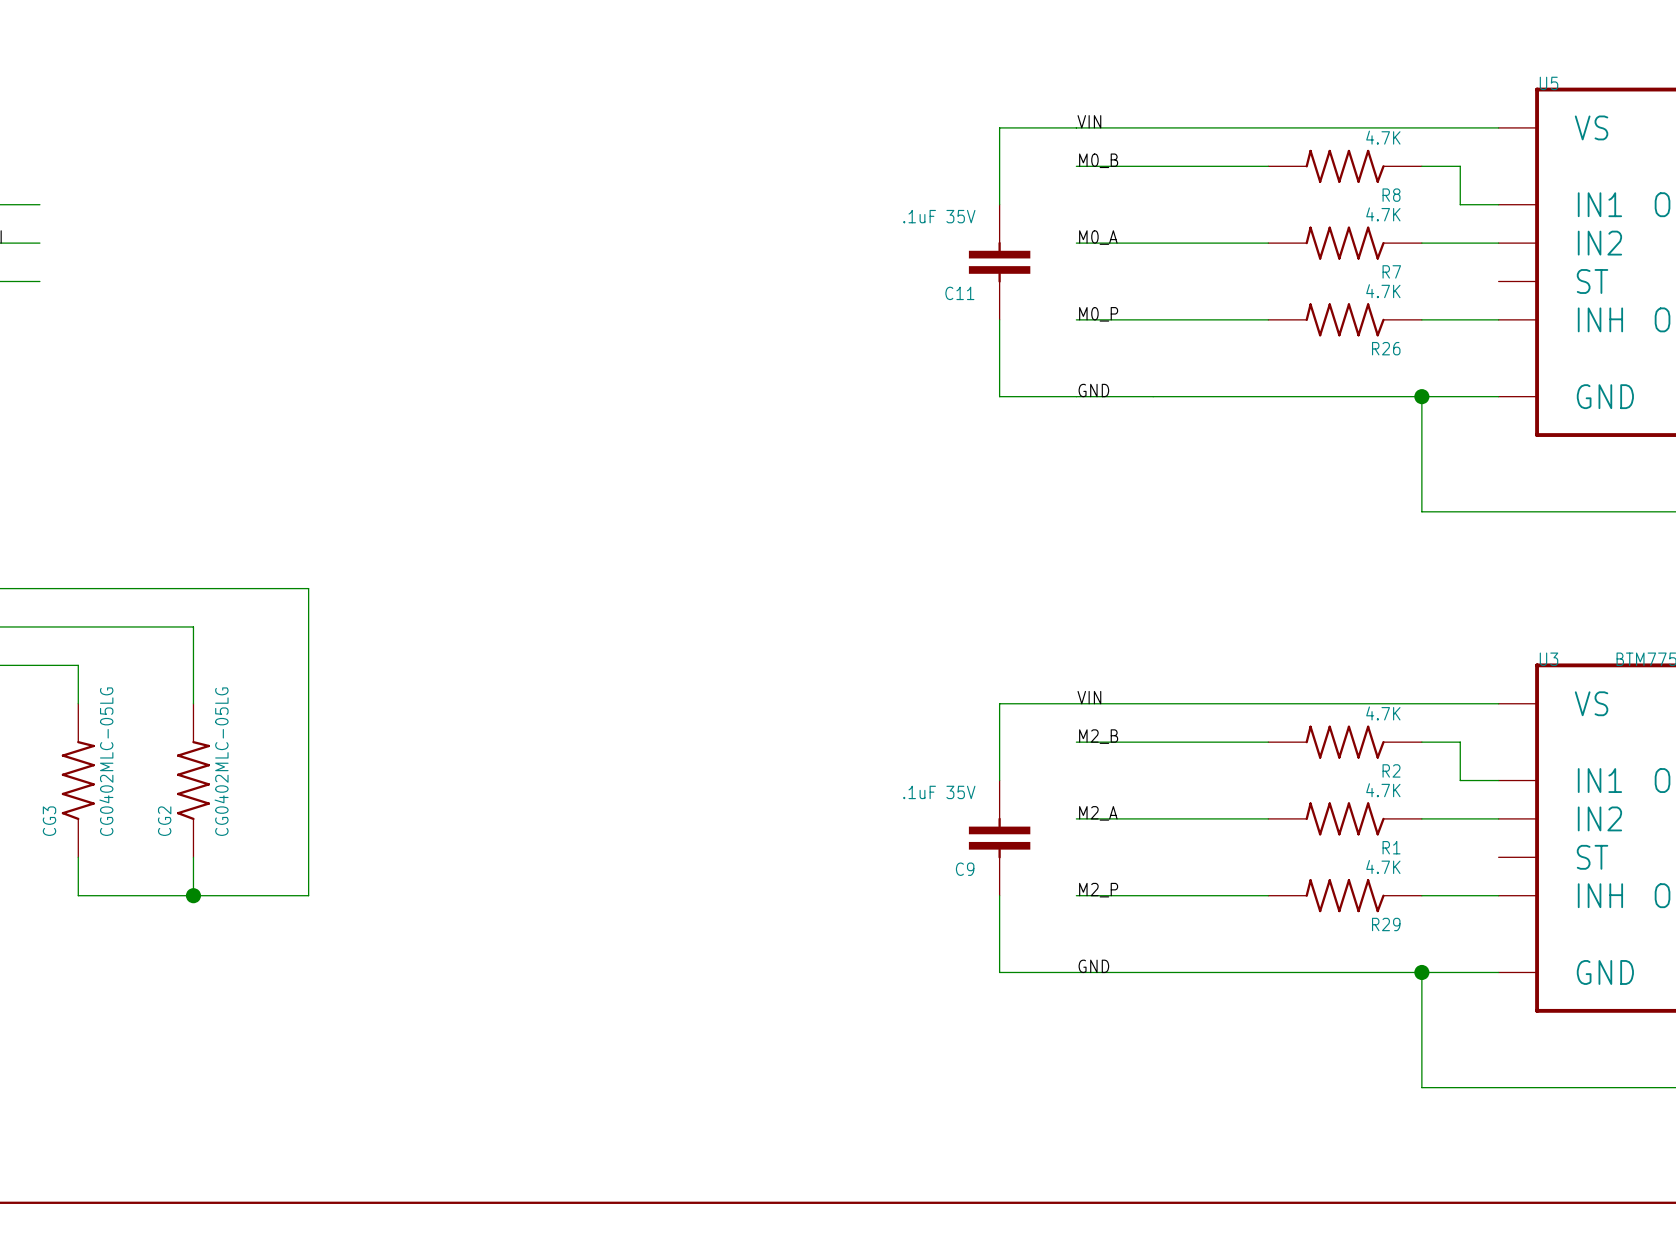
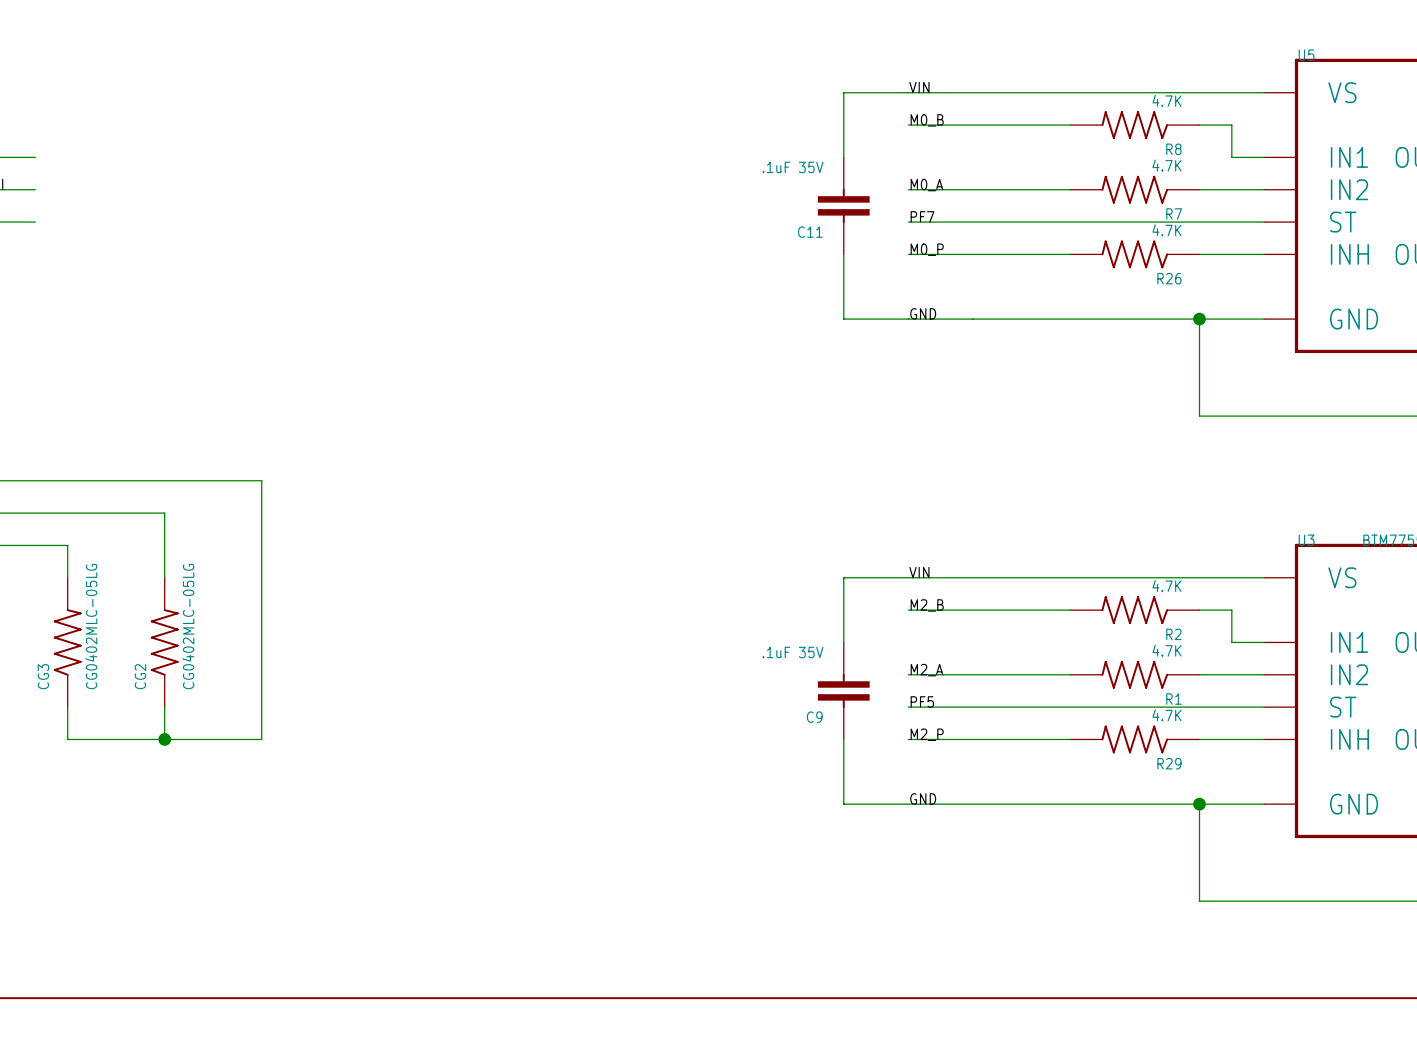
label: none -> PF7 (922, 216)
wire: none -> (908, 222) (1264, 222)
label: none -> PF5 (922, 701)
wire: none -> (908, 707) (1264, 707)

